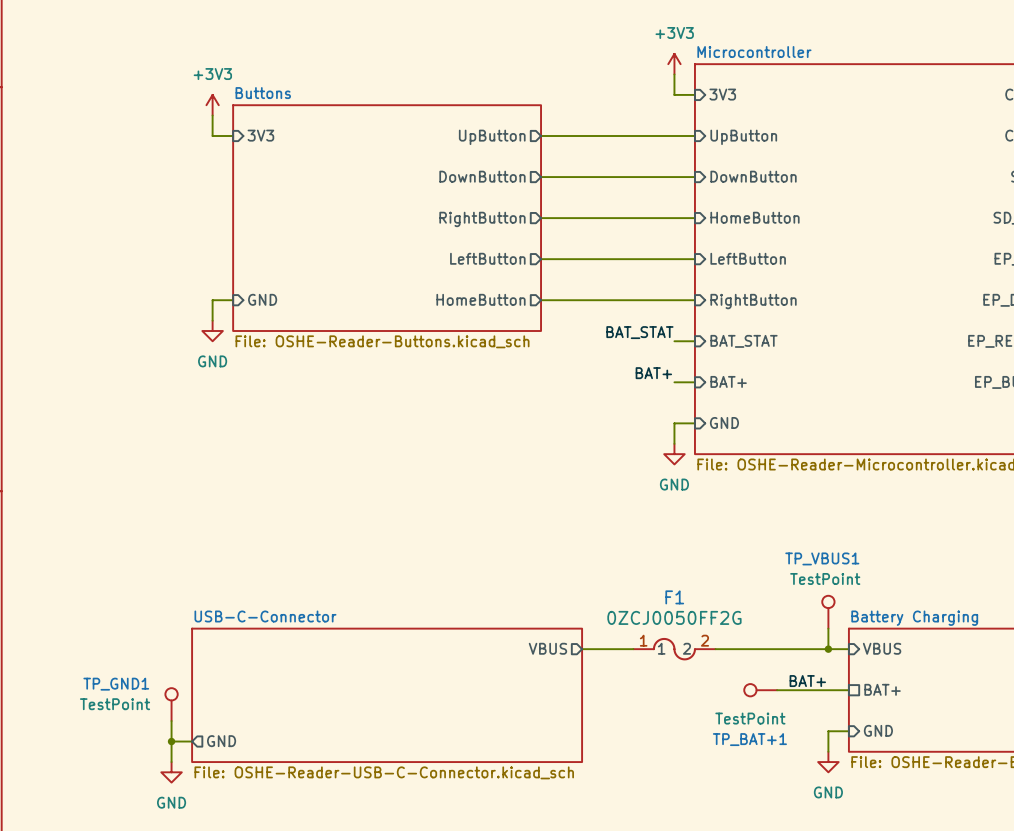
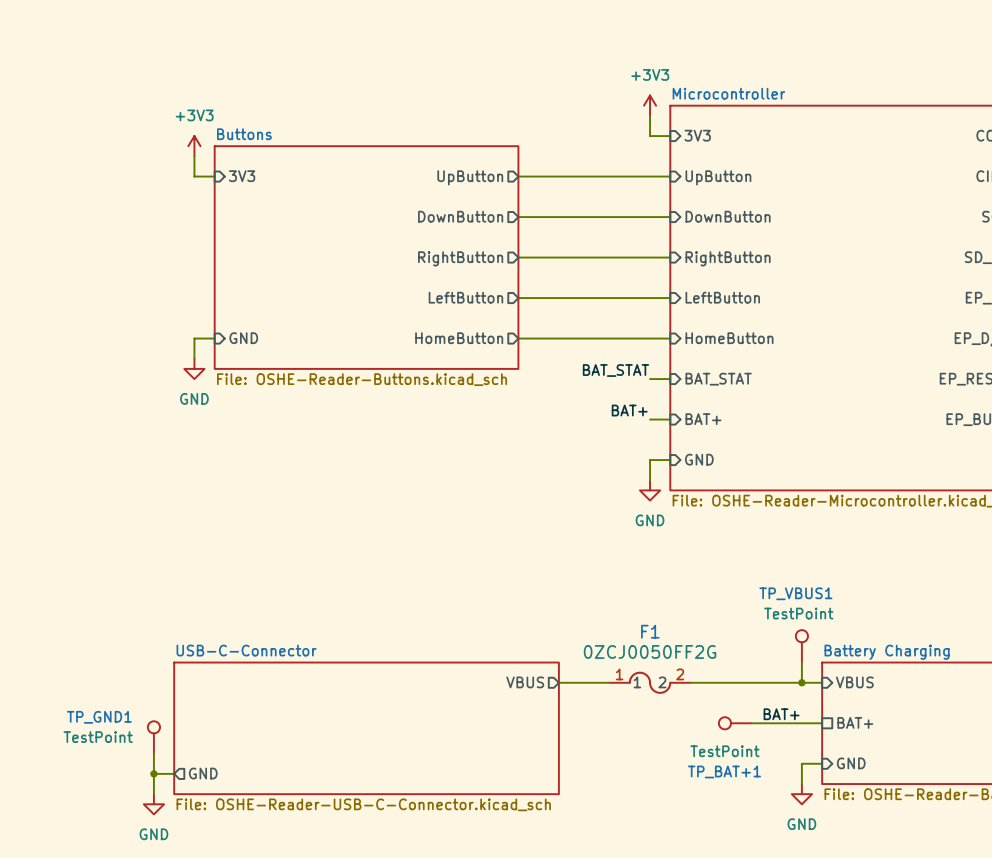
sheet pin: HomeButton (755, 217) -> RightButton (728, 258)
sheet pin: RightButton (753, 301) -> HomeButton (729, 338)

